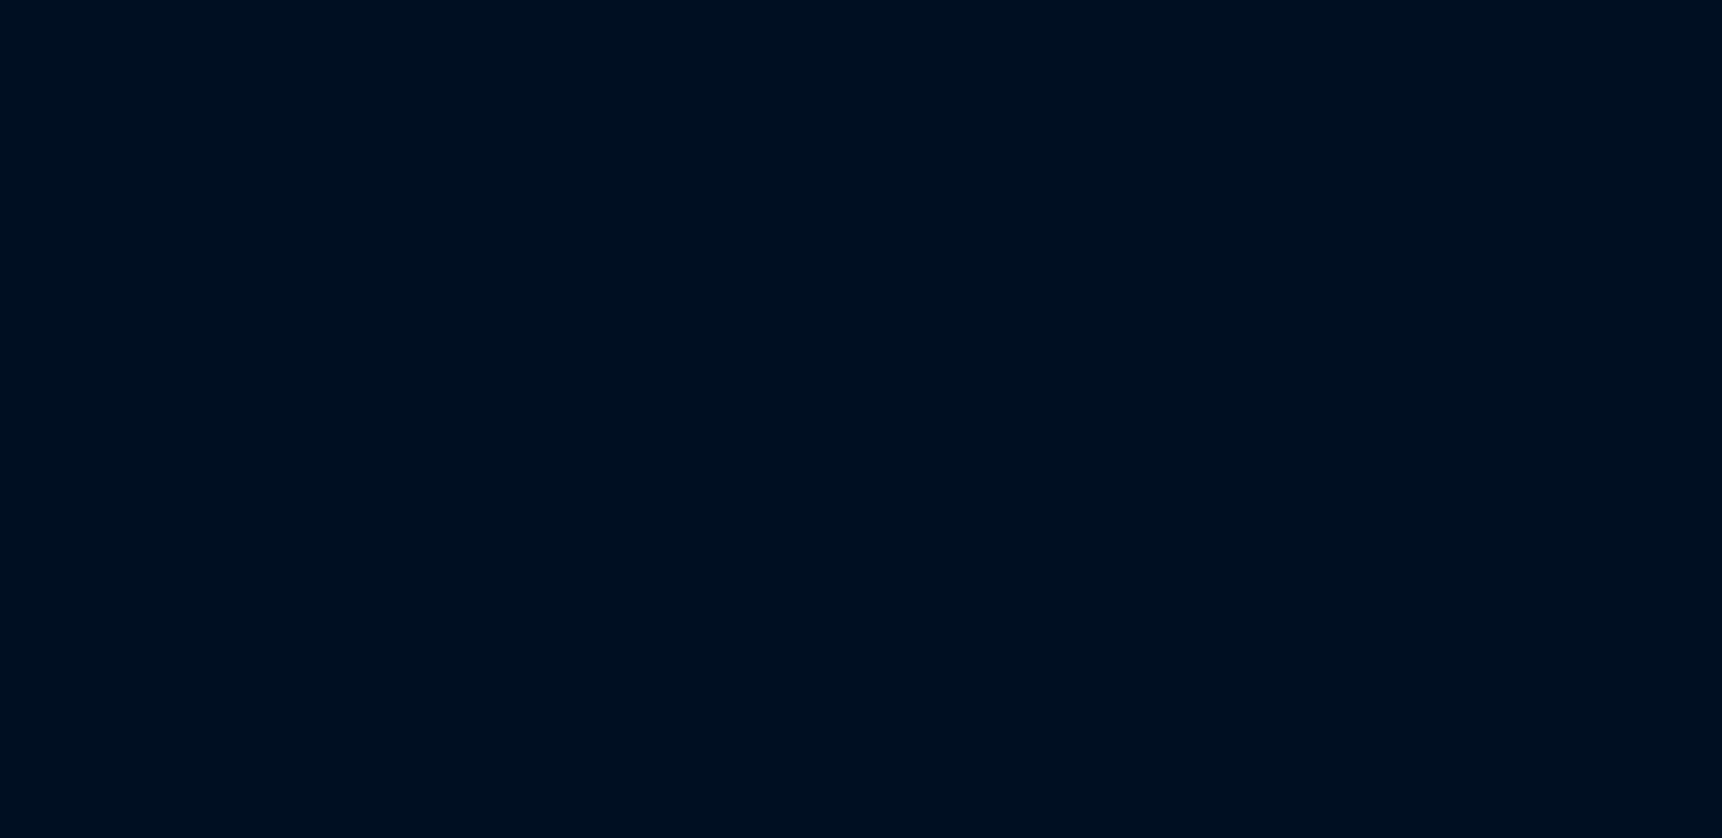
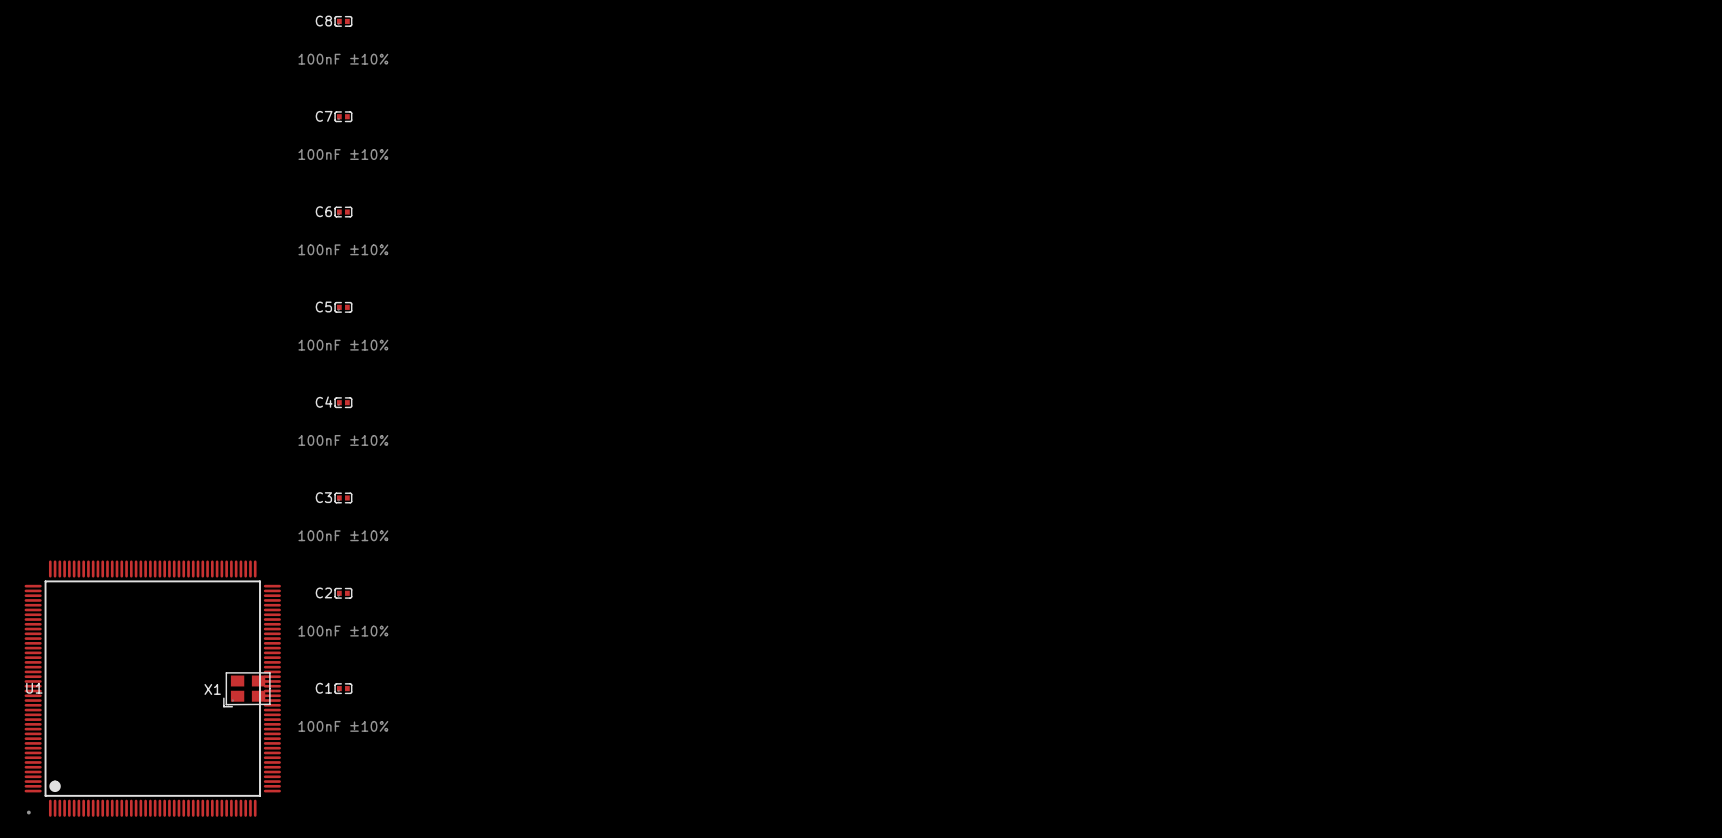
C8: none -> 100nF ±10% (343, 21)
C7: none -> 100nF ±10% (343, 116)
C6: none -> 100nF ±10% (343, 212)
C5: none -> 100nF ±10% (343, 307)
C4: none -> 100nF ±10% (343, 402)
C3: none -> 100nF ±10% (343, 497)
C2: none -> 100nF ±10% (343, 593)
U1: none -> (152, 688)
C1: none -> 100nF ±10% (343, 688)
X1: none -> (246, 689)

